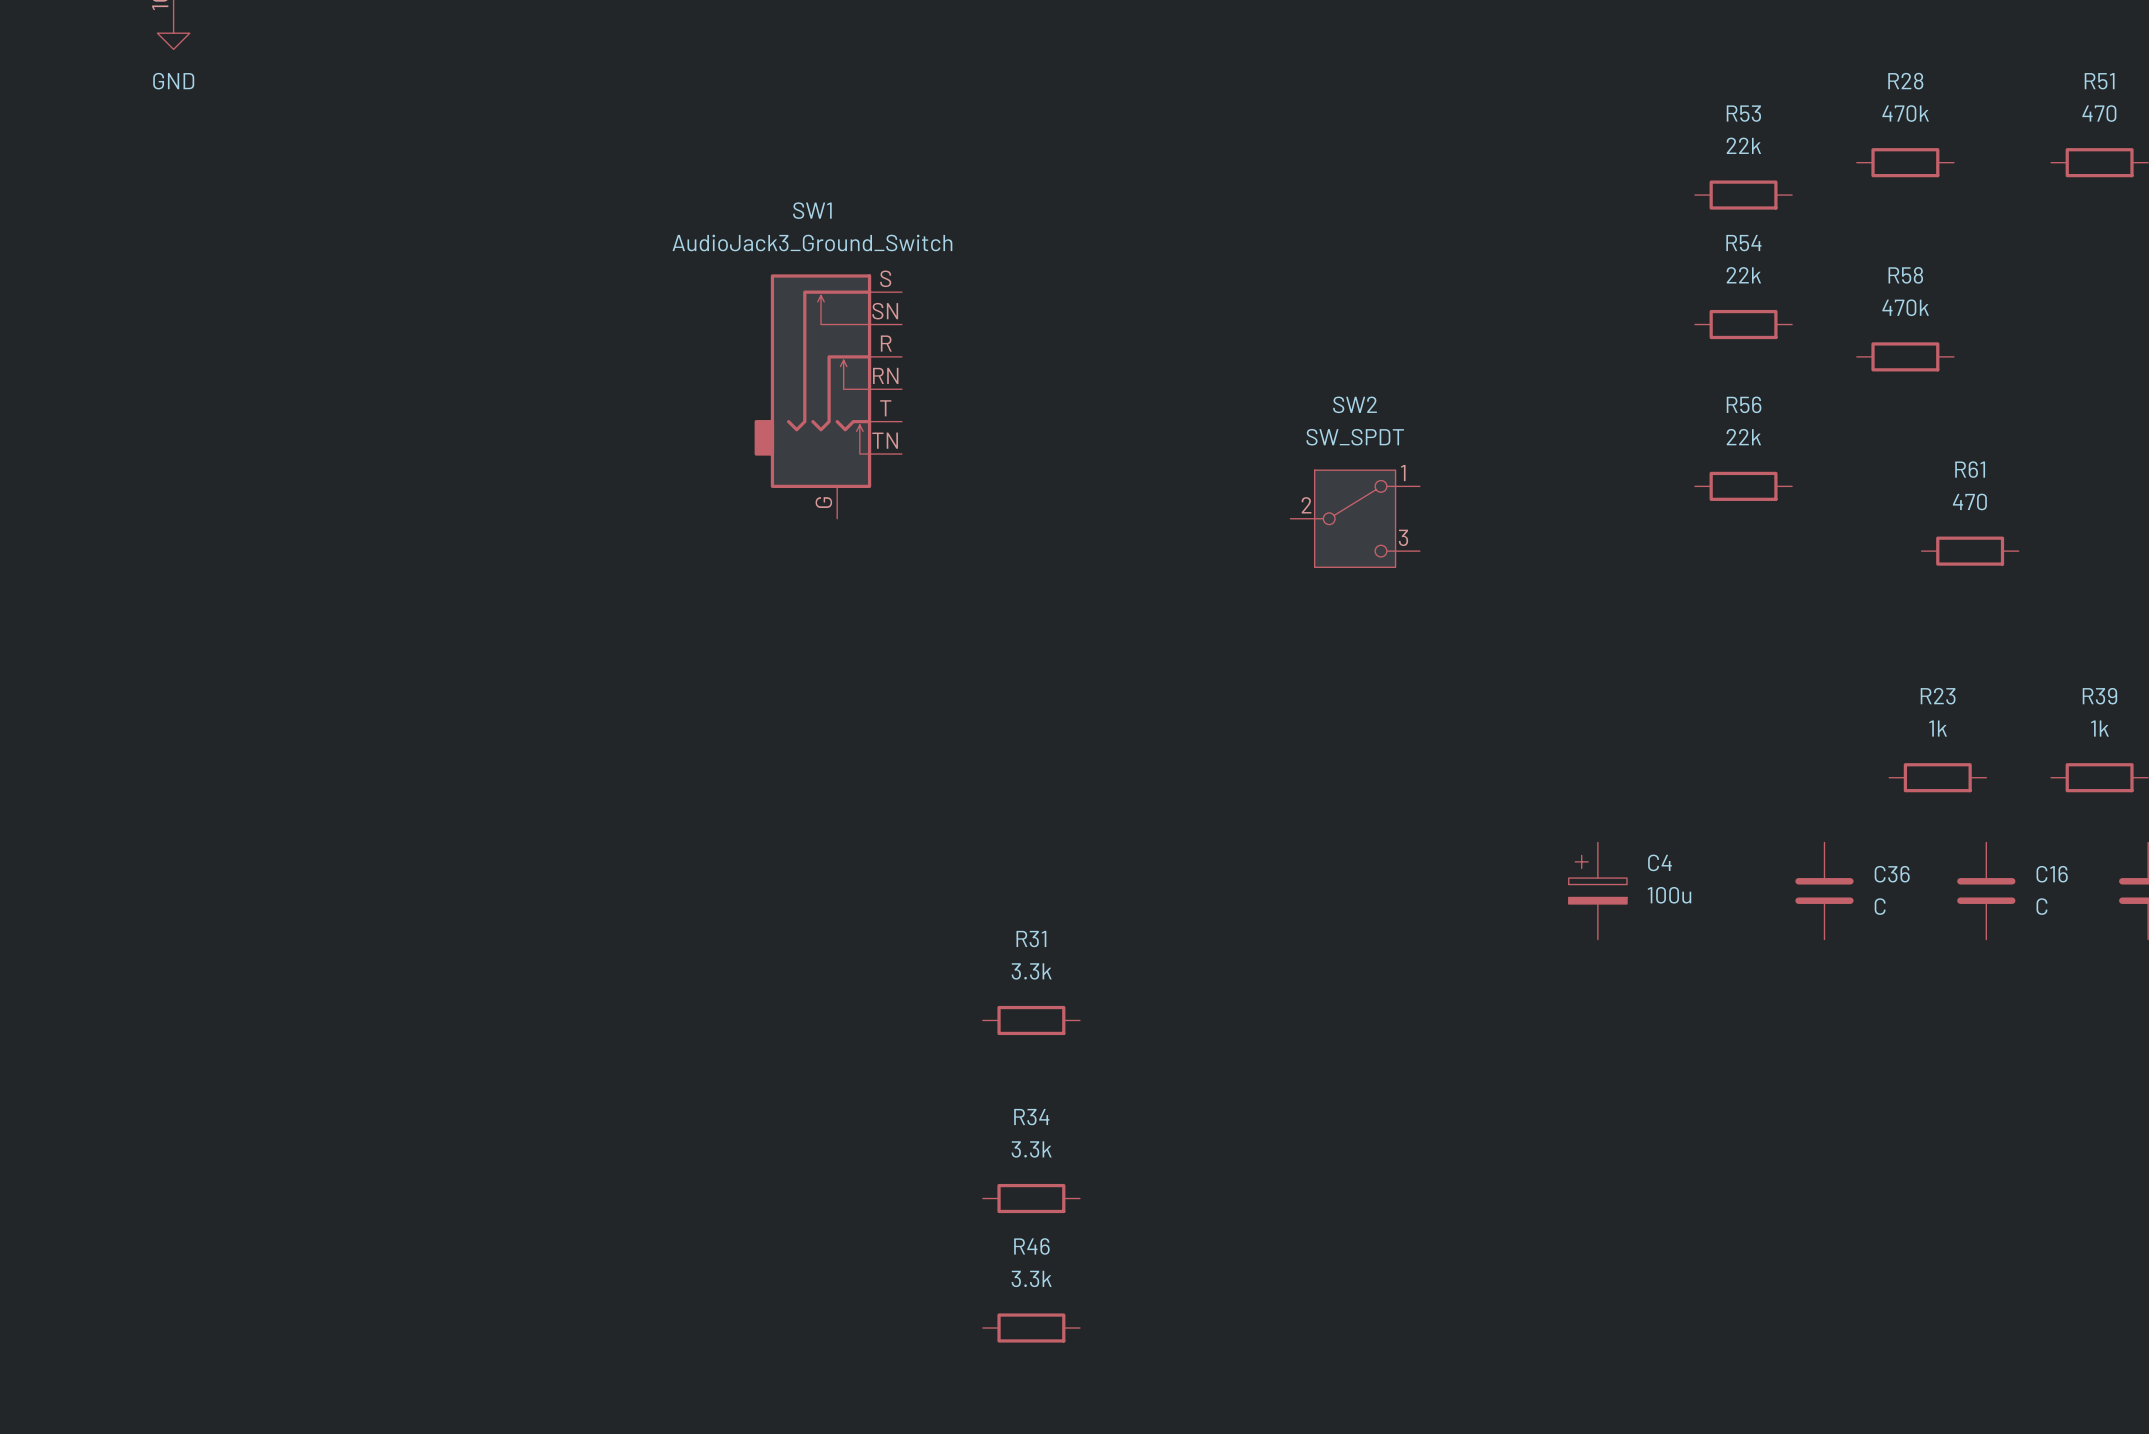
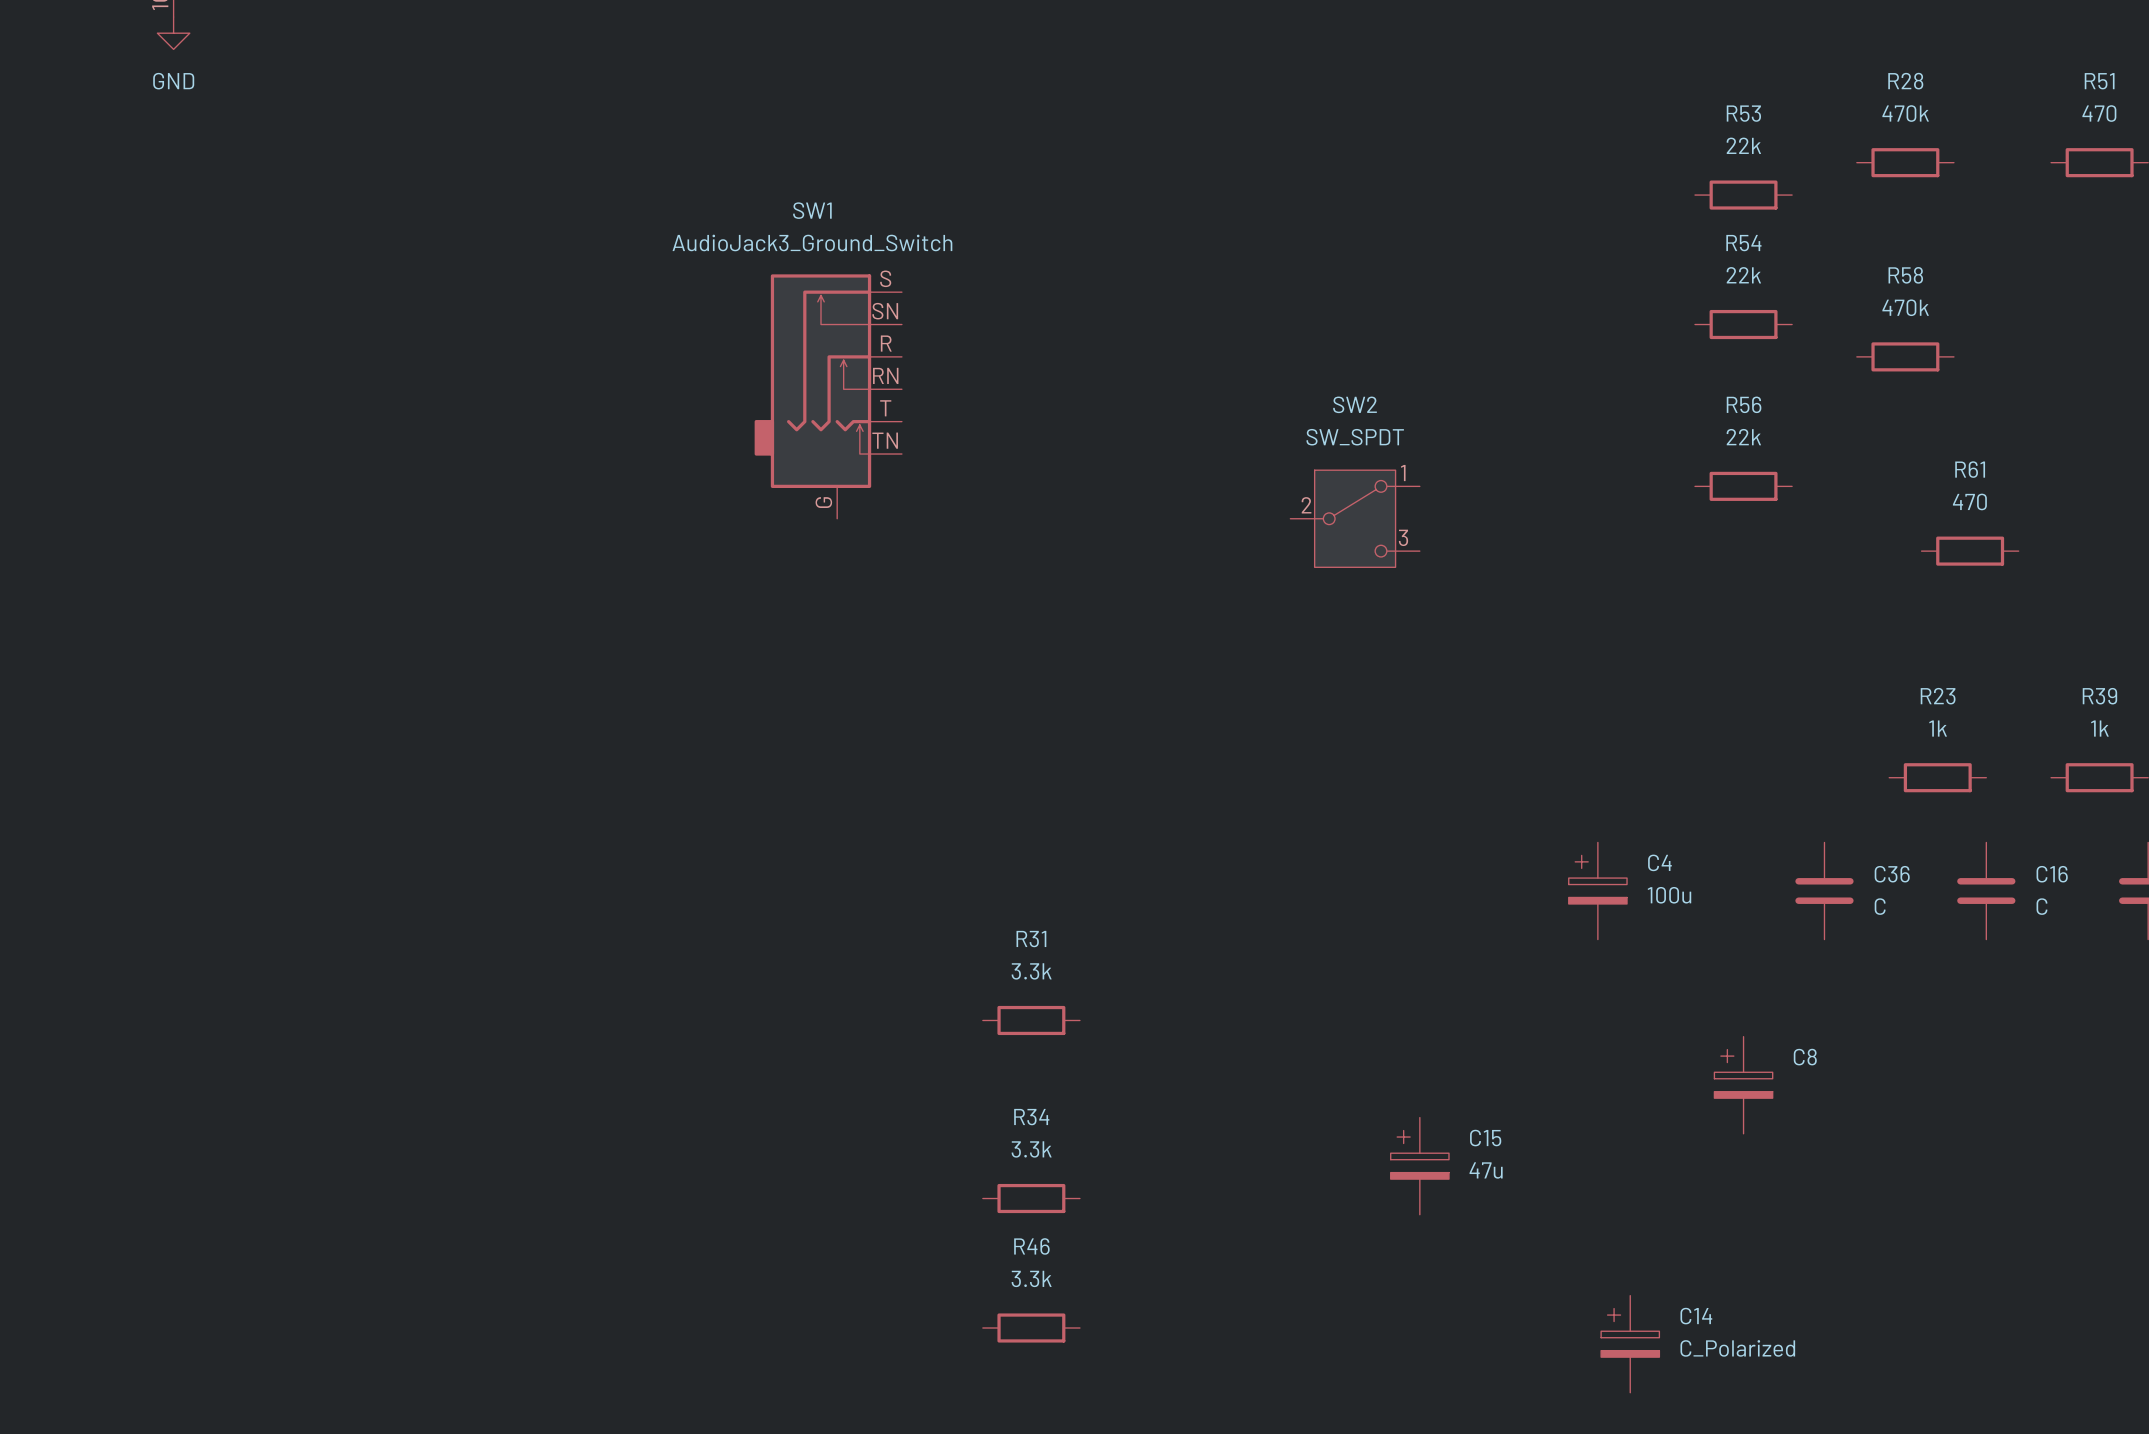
C8: none -> (1743, 1085)
C15: none -> 47u (1419, 1166)
C14: none -> C_Polarized (1630, 1344)

